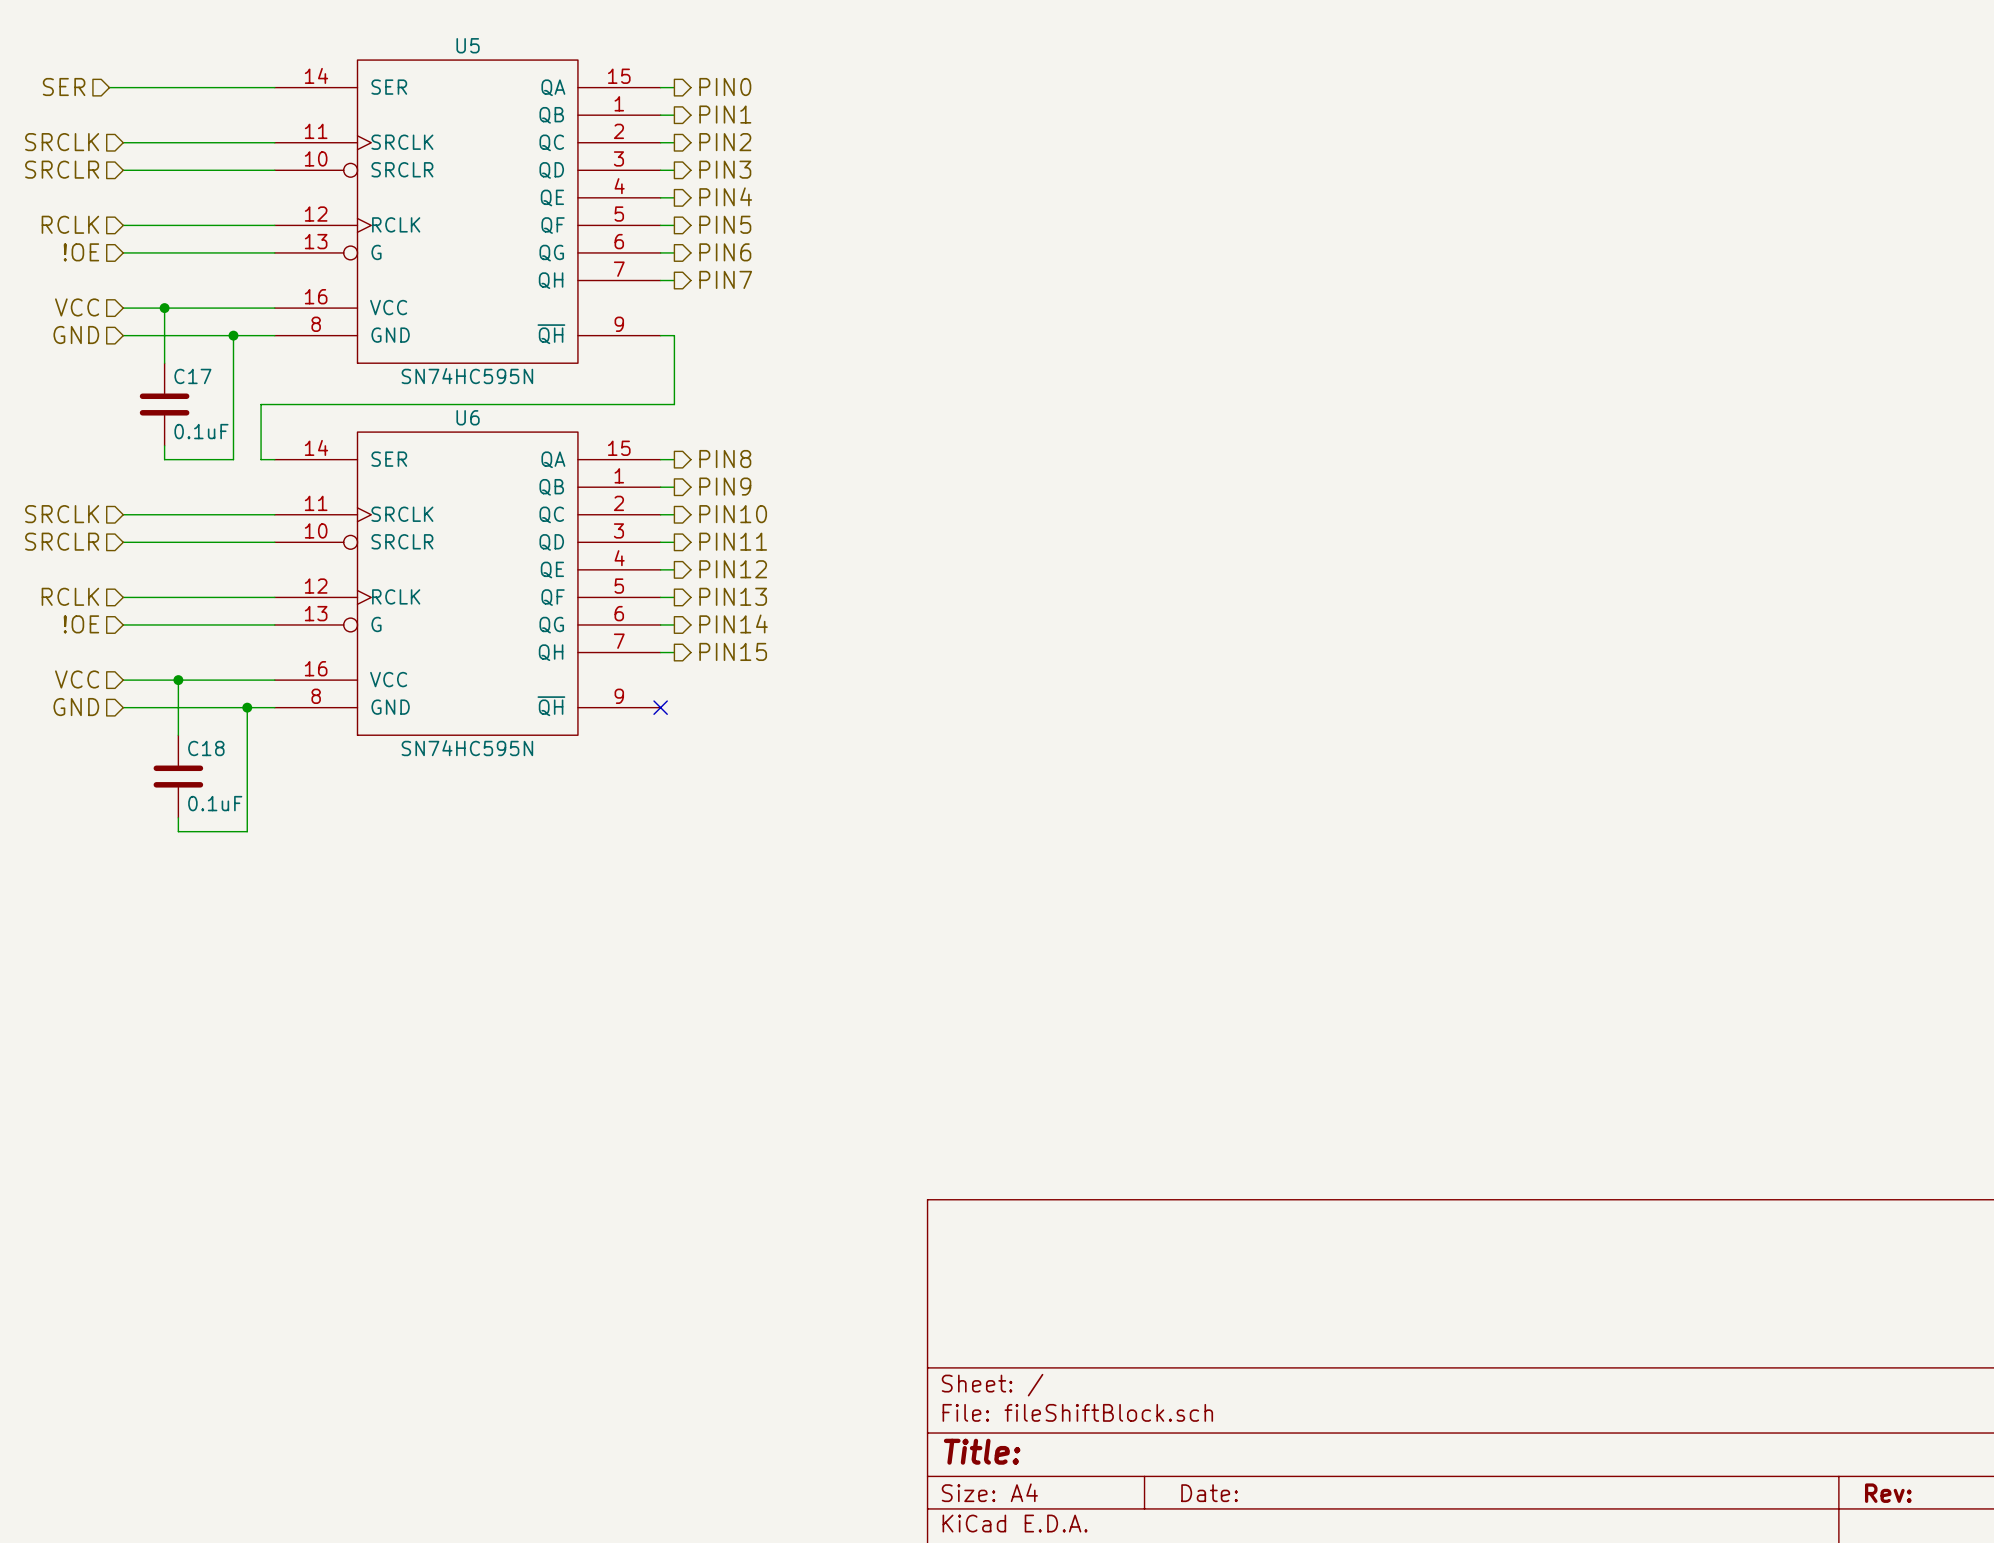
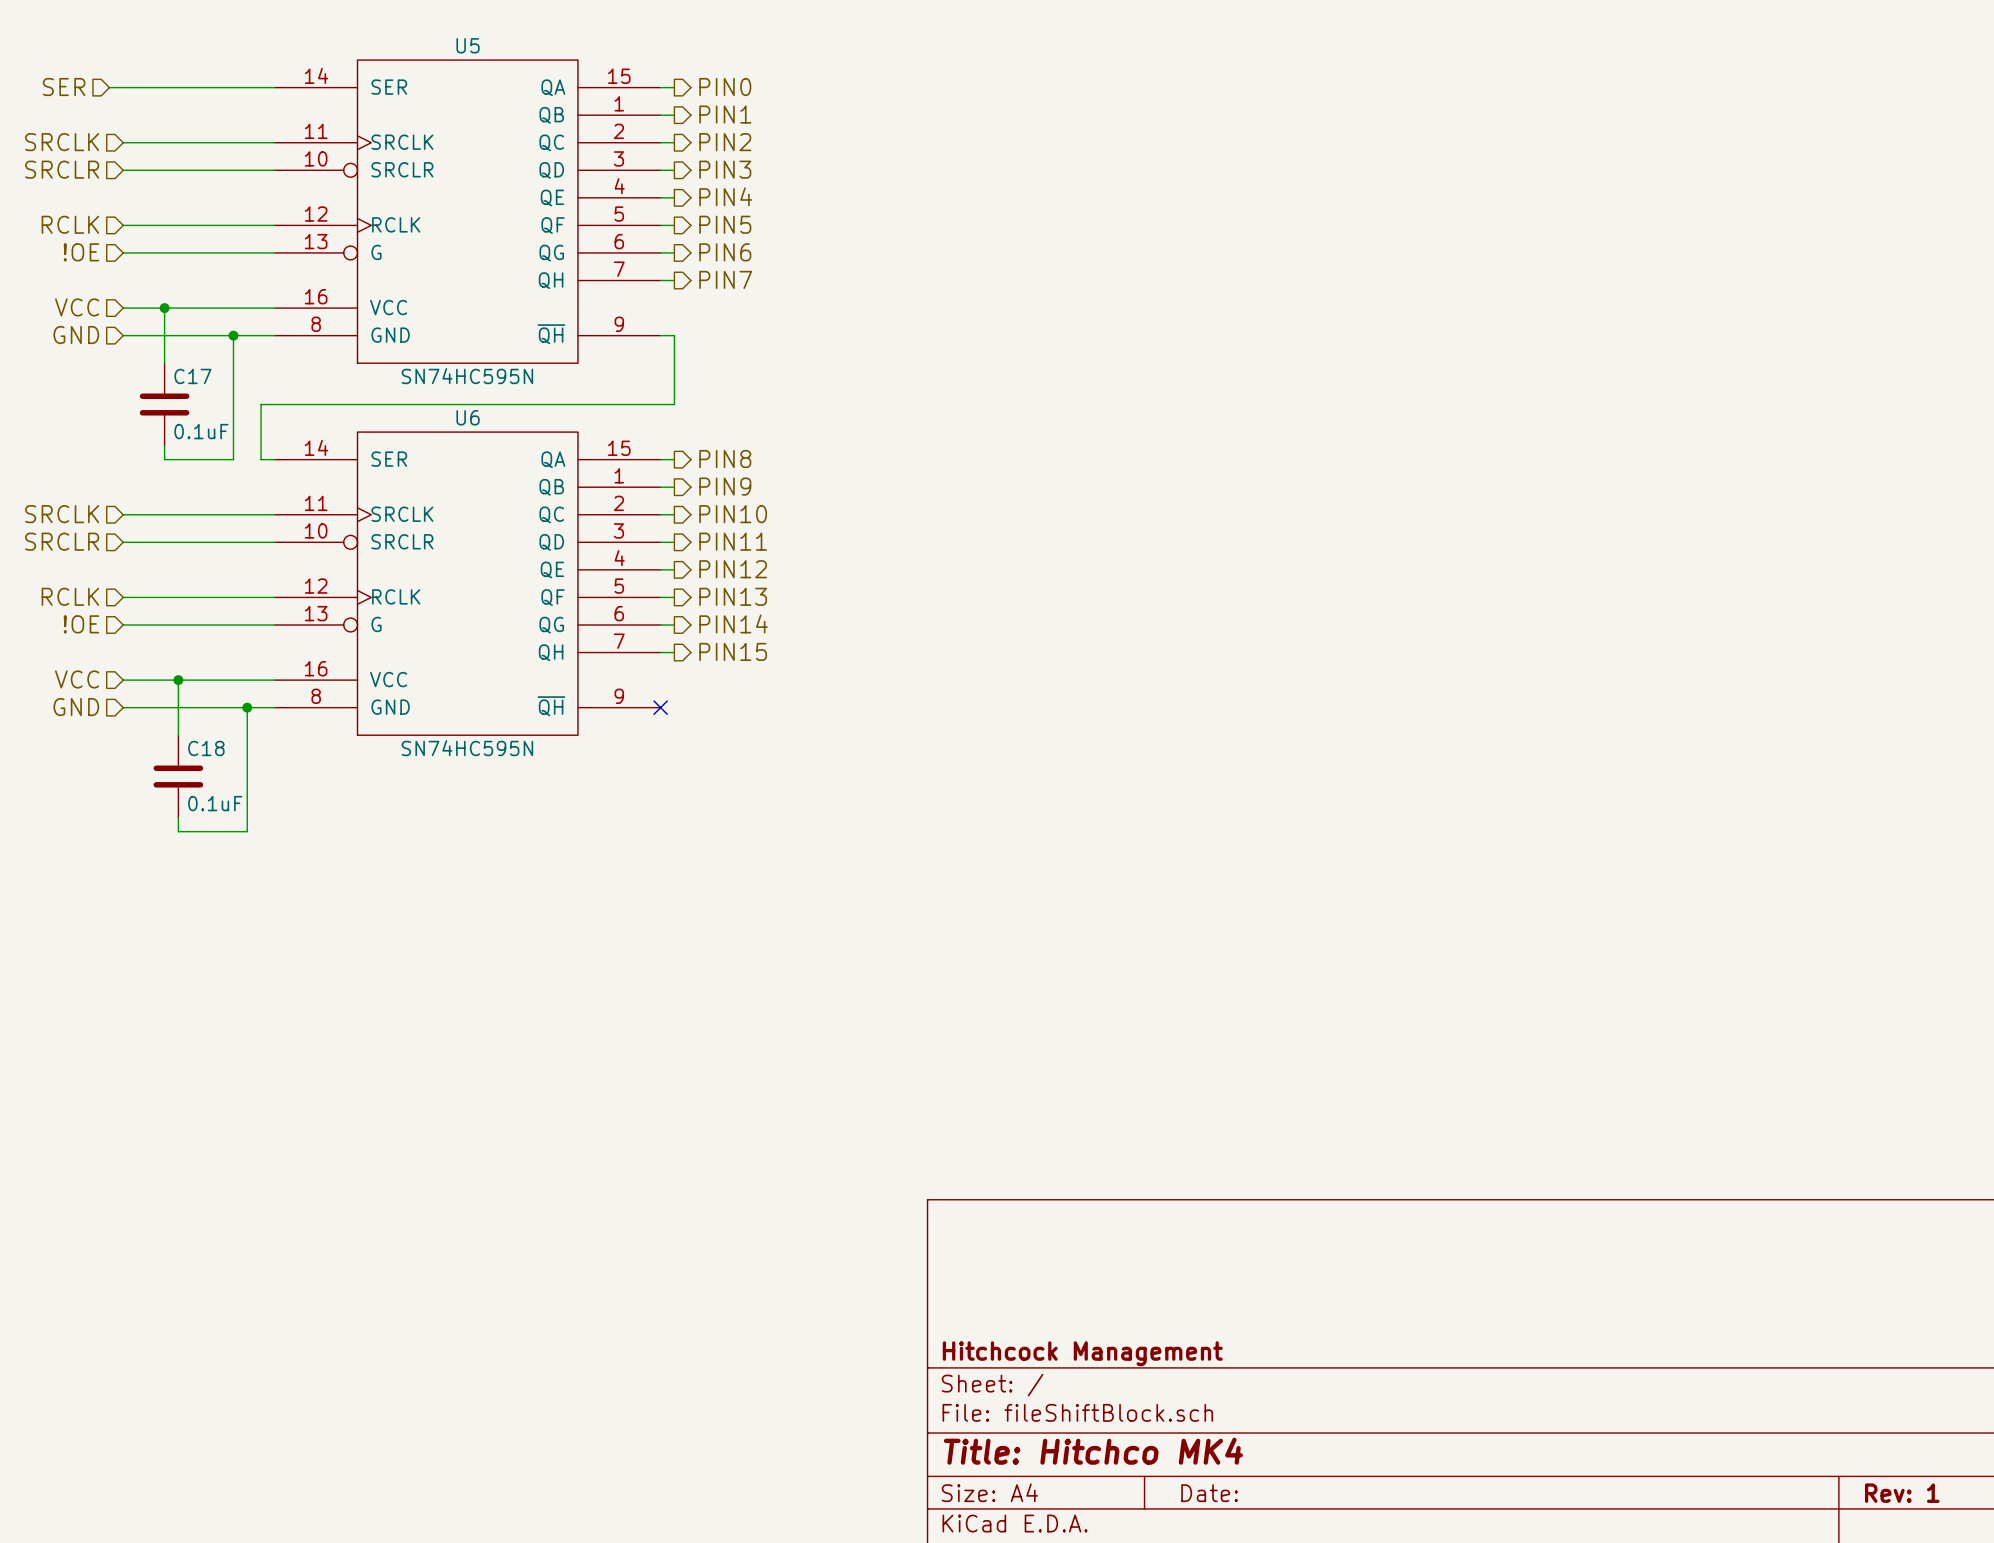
title block: none -> Hitchcock Management (1082, 1353)
title block: Title: (982, 1451) -> Title: Hitchco MK4 (1093, 1451)
title block: Rev: (1888, 1493) -> Rev: 1 (1902, 1493)

